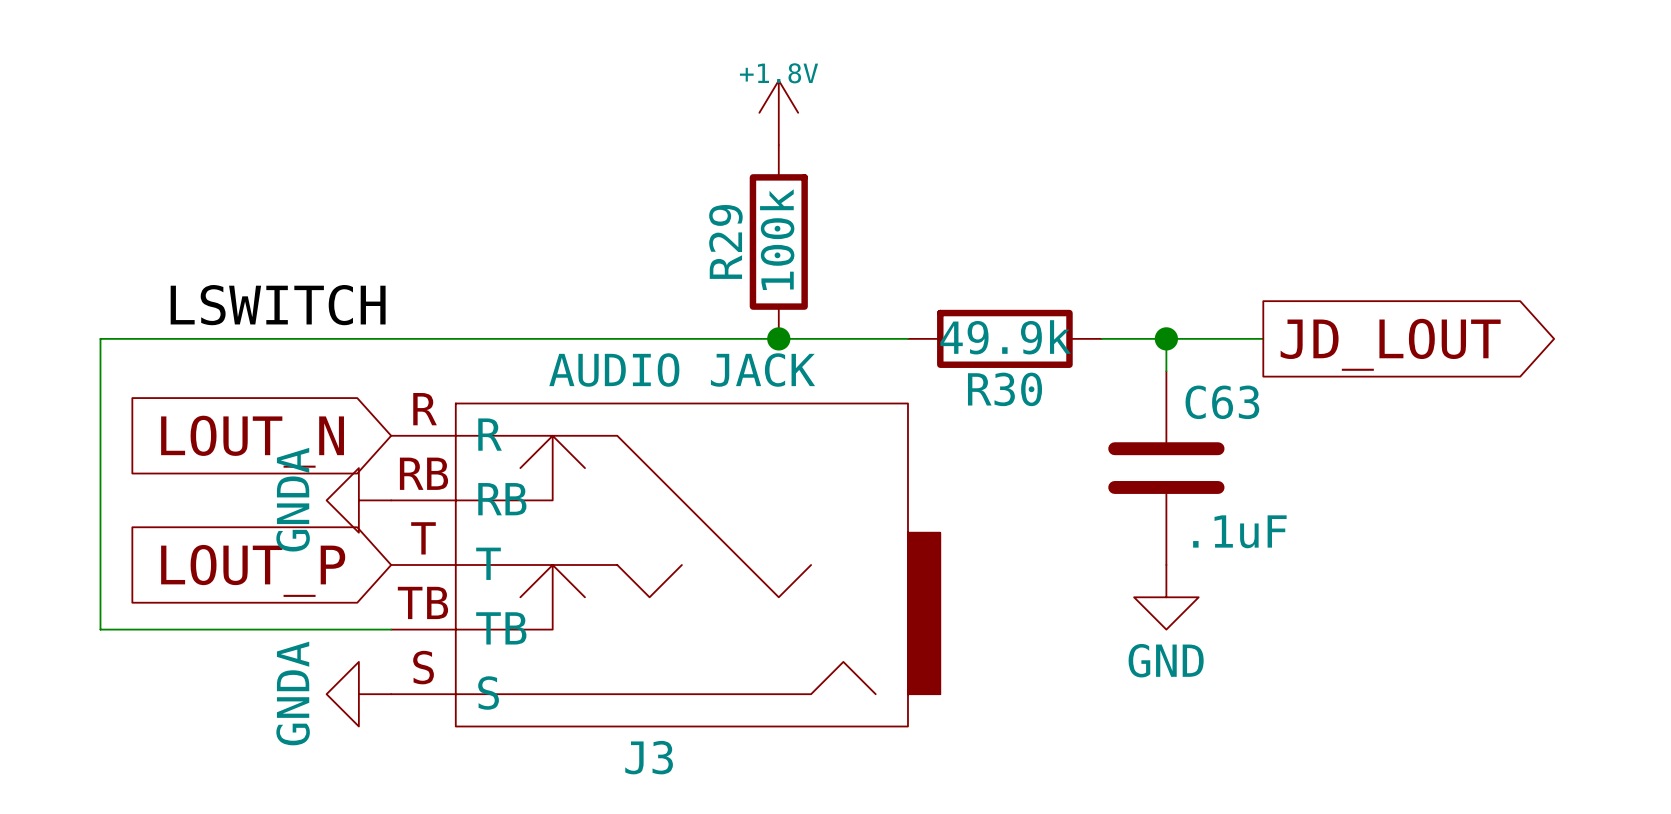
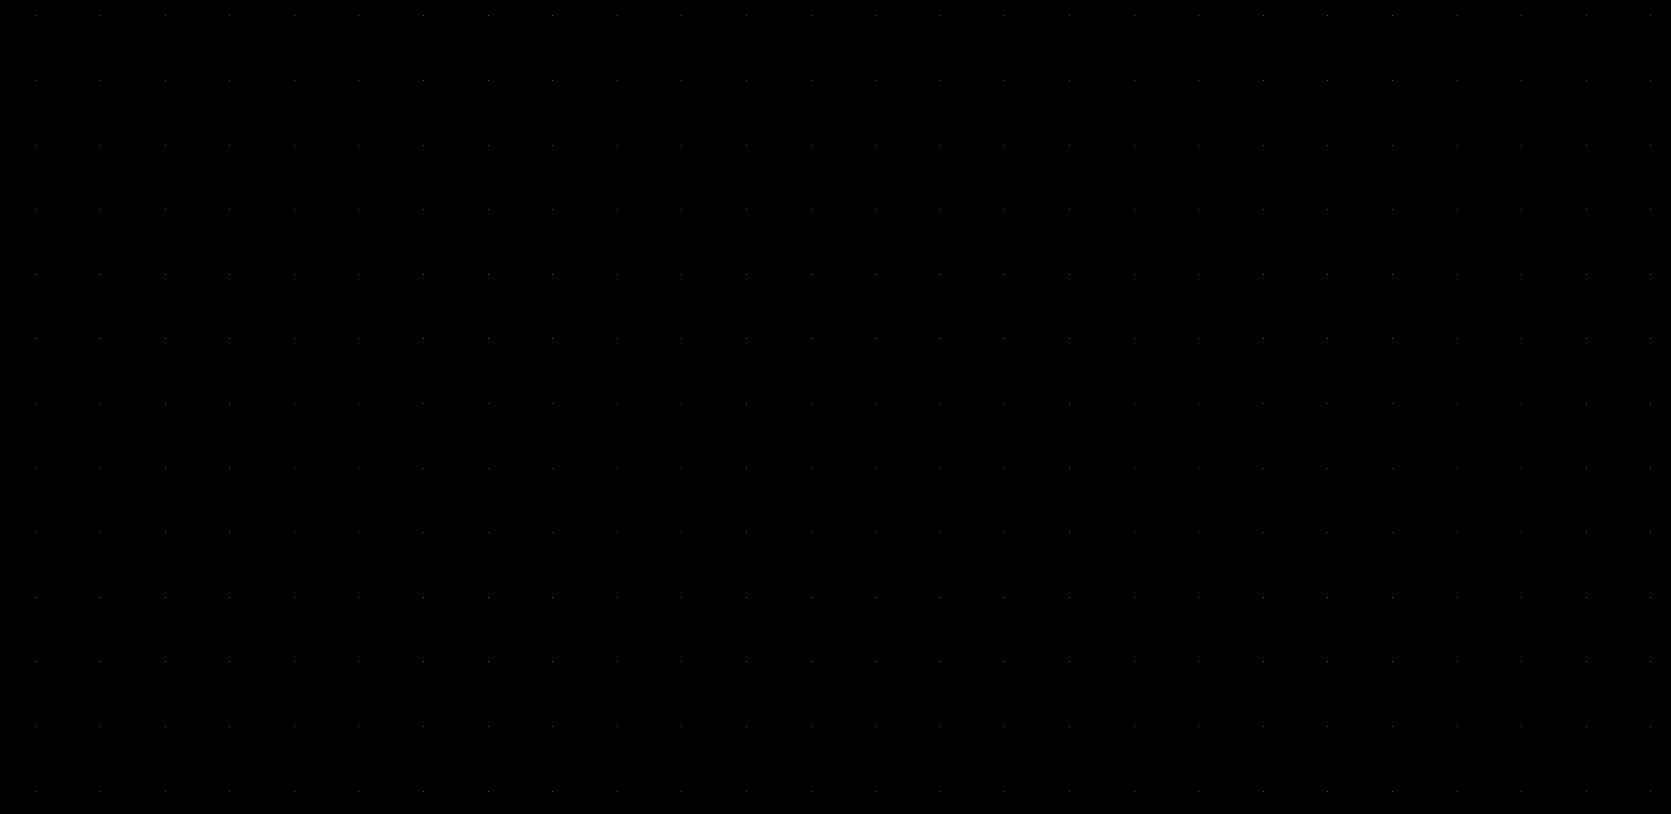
power symbol: +1.8V (778, 112) -> none
R29: 100k (778, 241) -> none
label: LSWITCH (278, 305) -> none
junction: (778, 338) -> none
wire: (907, 338) (100, 338) (100, 629) (391, 629) -> none
R30: 49.9k (1004, 338) -> none
wire: (1101, 338) (1263, 338) -> none
wire: (1166, 338) (1166, 371) -> none
junction: (1166, 338) -> none
global label: JD_LOUT (1390, 344) -> none
global label: LOUT_N (252, 441) -> none
C63: .1uF (1166, 468) -> none
power symbol: GNDA (358, 500) -> none
J3: AUDIO JACK (665, 564) -> none
global label: LOUT_P (253, 570) -> none
power symbol: GND (1166, 597) -> none
power symbol: GNDA (358, 694) -> none

